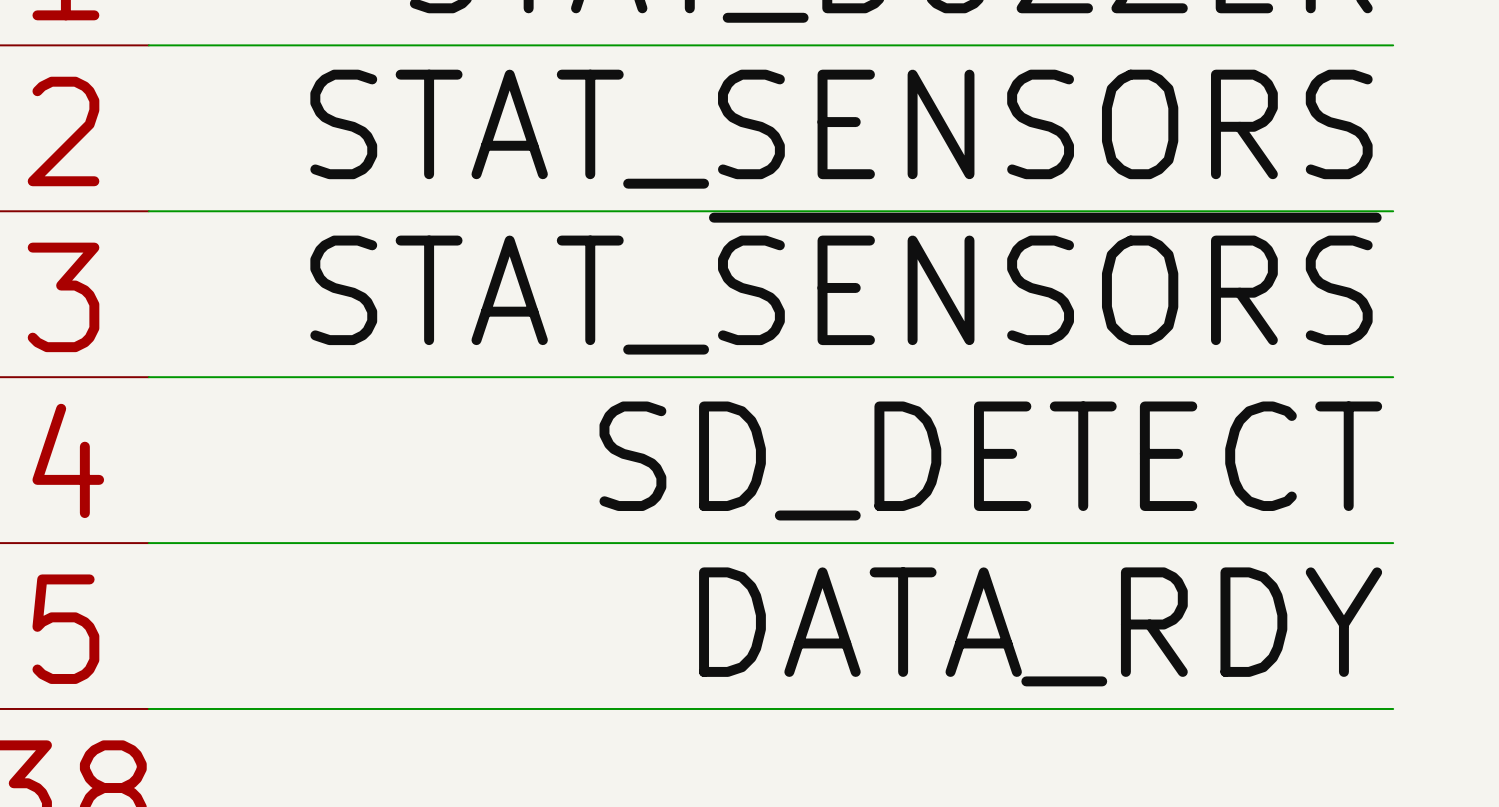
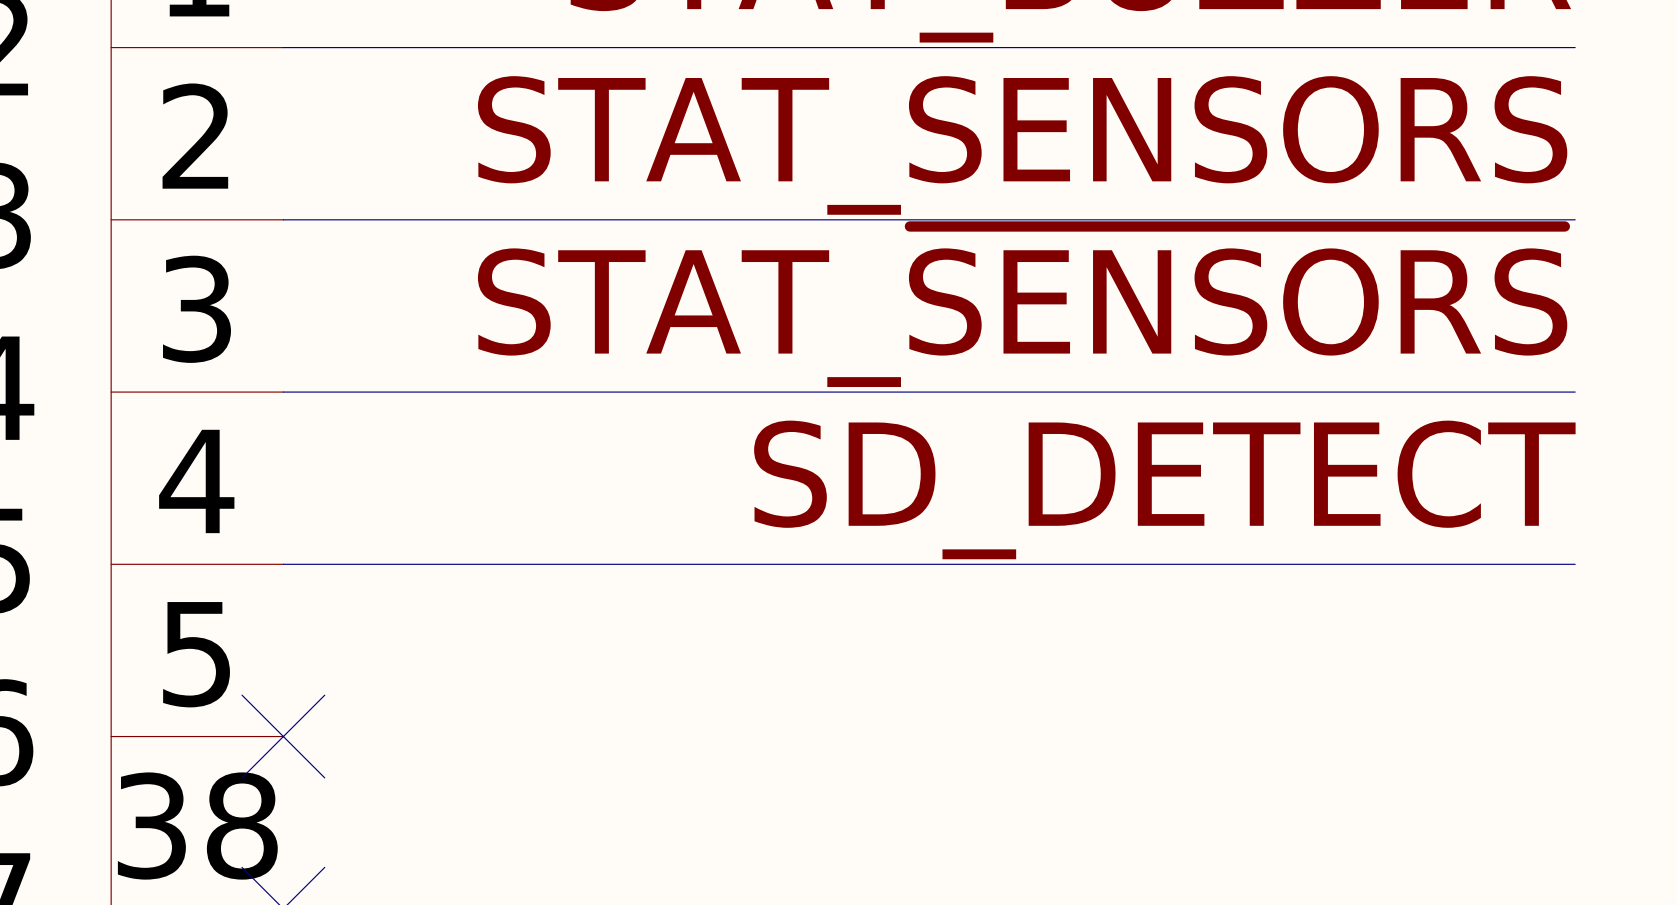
label: DATA_RDY (1040, 626) -> none
wire: (148, 708) (1393, 708) -> none
no-connect mark: none -> (283, 736)

